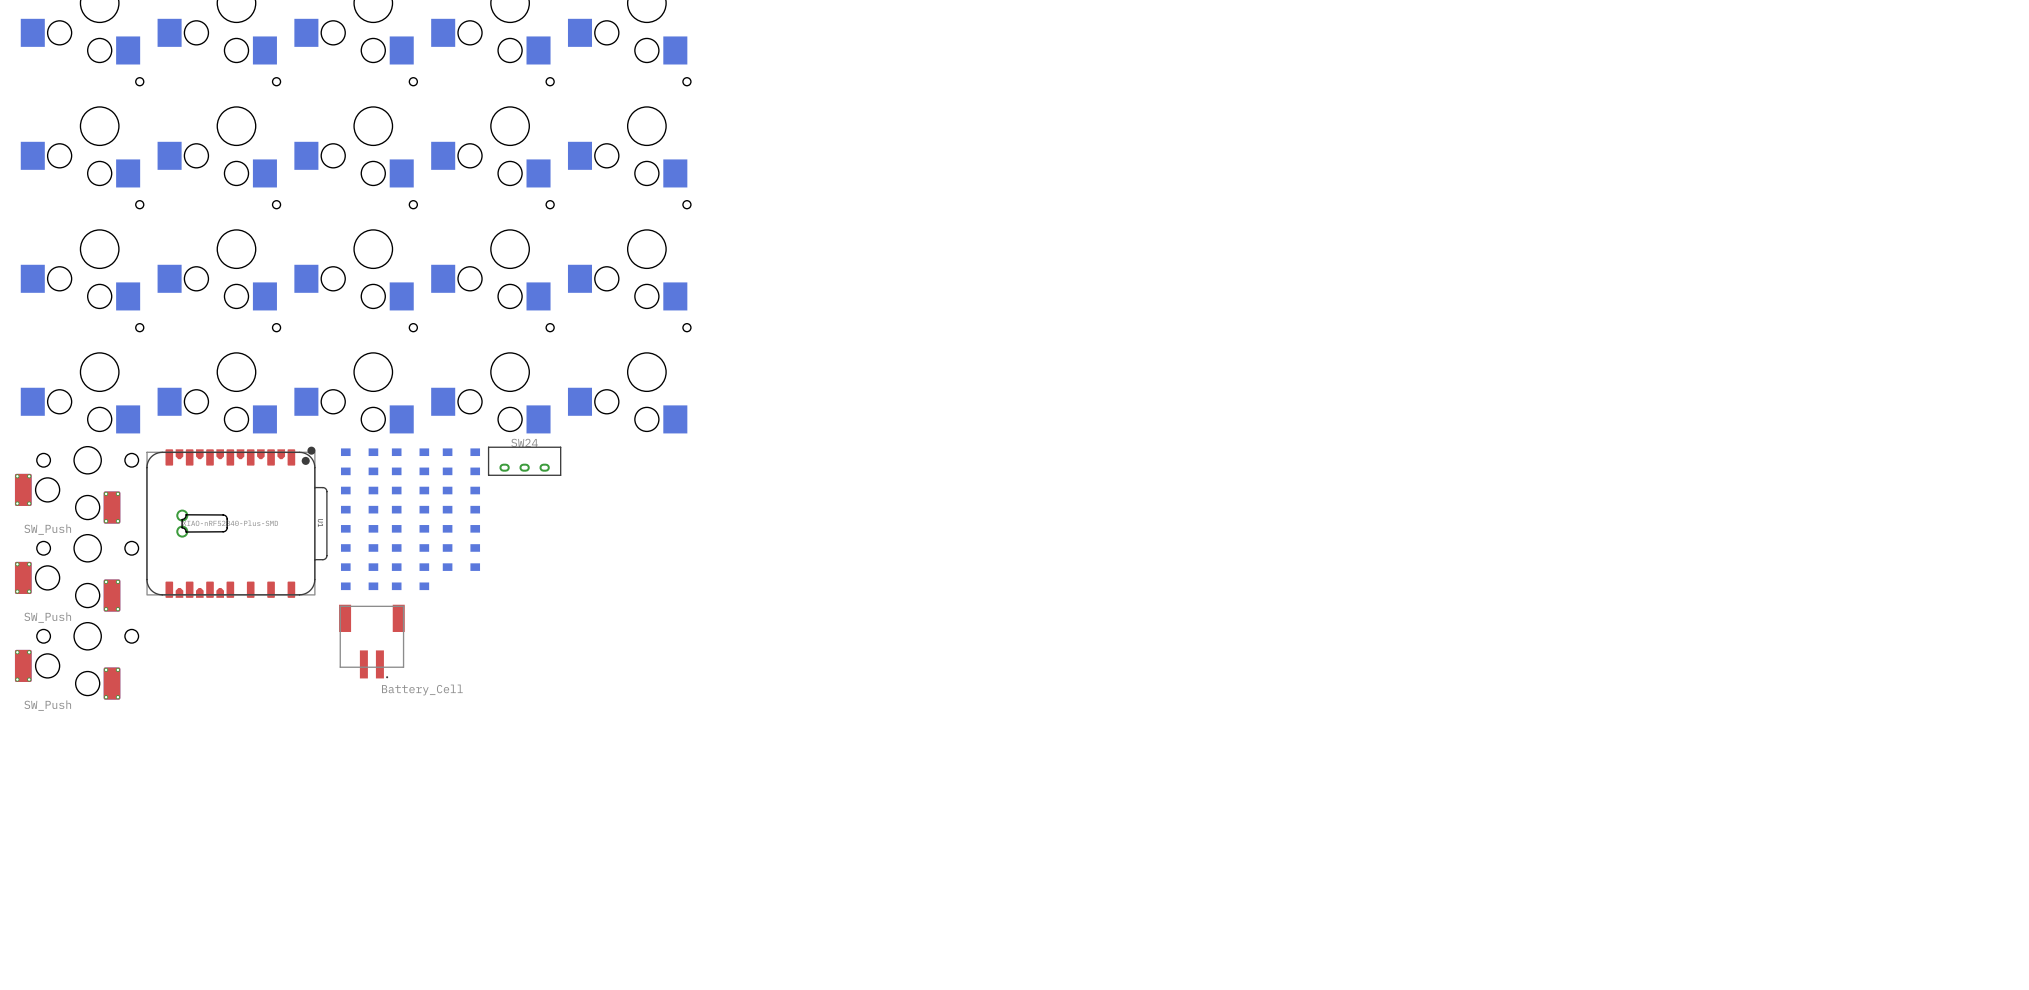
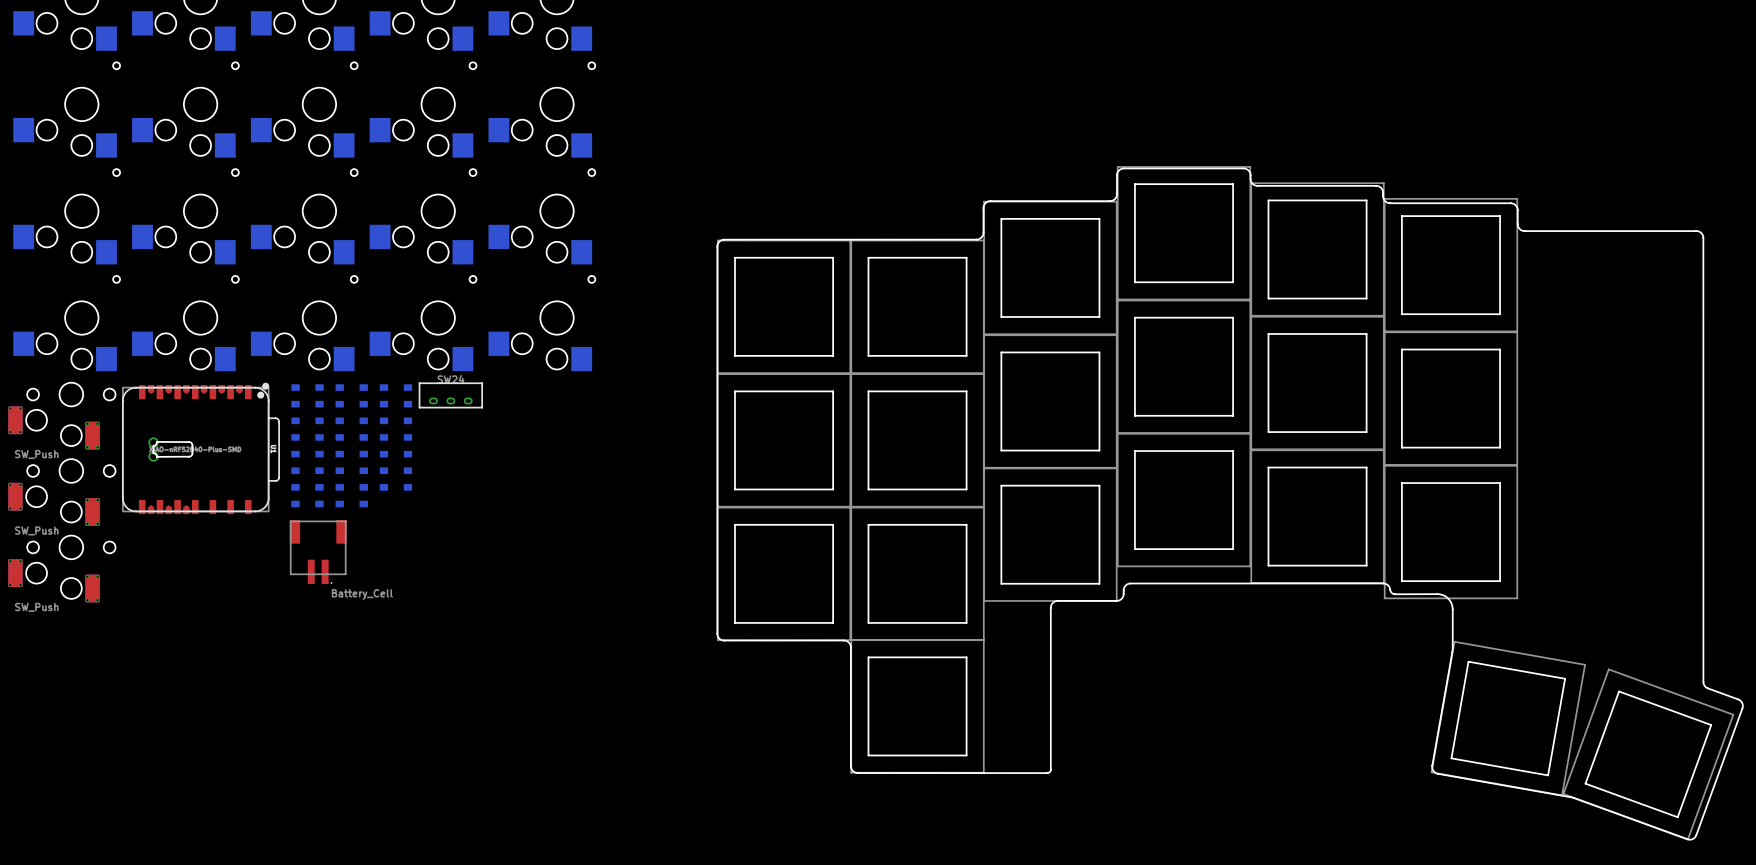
drawing: none -> [717, 166, 1518, 774]
board edge: none -> (1524, 231) (1518, 227) (1517, 207) (1511, 203) (1389, 203) (1383, 199) (1381, 188) (1376, 185) (1255, 185) (1251, 181) (1249, 171) (1244, 168) (1123, 168) (1117, 173) (1116, 195) (1111, 200) (987, 201) (983, 207) (983, 232)
board edge: none -> (1524, 231) (1697, 231) (1703, 236) (1703, 682) (1707, 688) (1739, 699) (1742, 705) (1696, 835) (1692, 839) (1687, 839) (1572, 797) (1434, 771) (1432, 765) (1452, 647) (1452, 606) (1448, 598) (1440, 594) (1393, 594) (1388, 585) (1383, 583) (1130, 583) (1125, 586) (1122, 596) (1118, 600) (1054, 601) (1050, 607) (1050, 769) (1047, 773) (855, 772) (850, 766) (850, 647) (848, 642) (843, 640) (724, 640)
board edge: none -> (983, 232) (981, 237) (976, 239) (724, 239) (718, 242) (717, 633) (719, 638) (724, 640)
drawing: none -> [1431, 641, 1734, 840]

